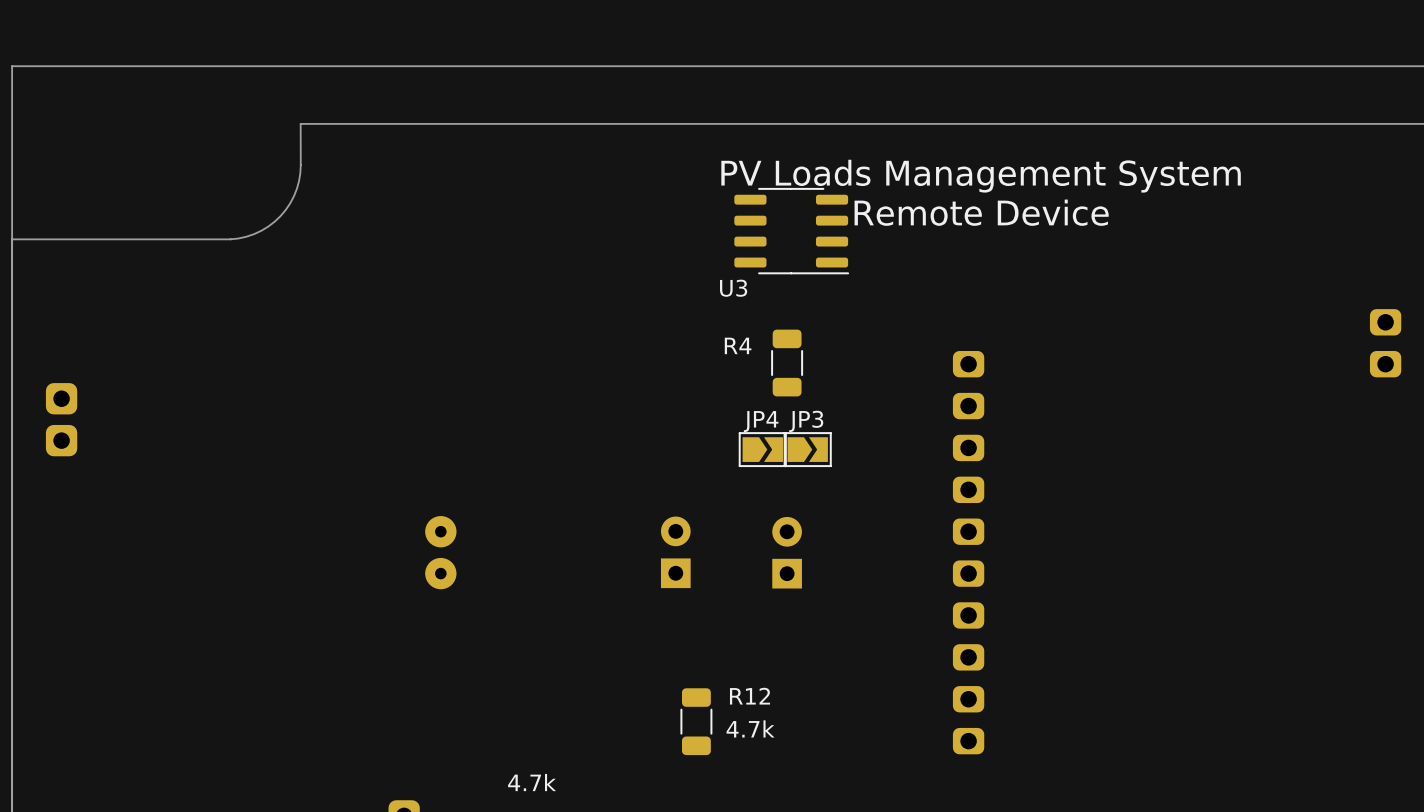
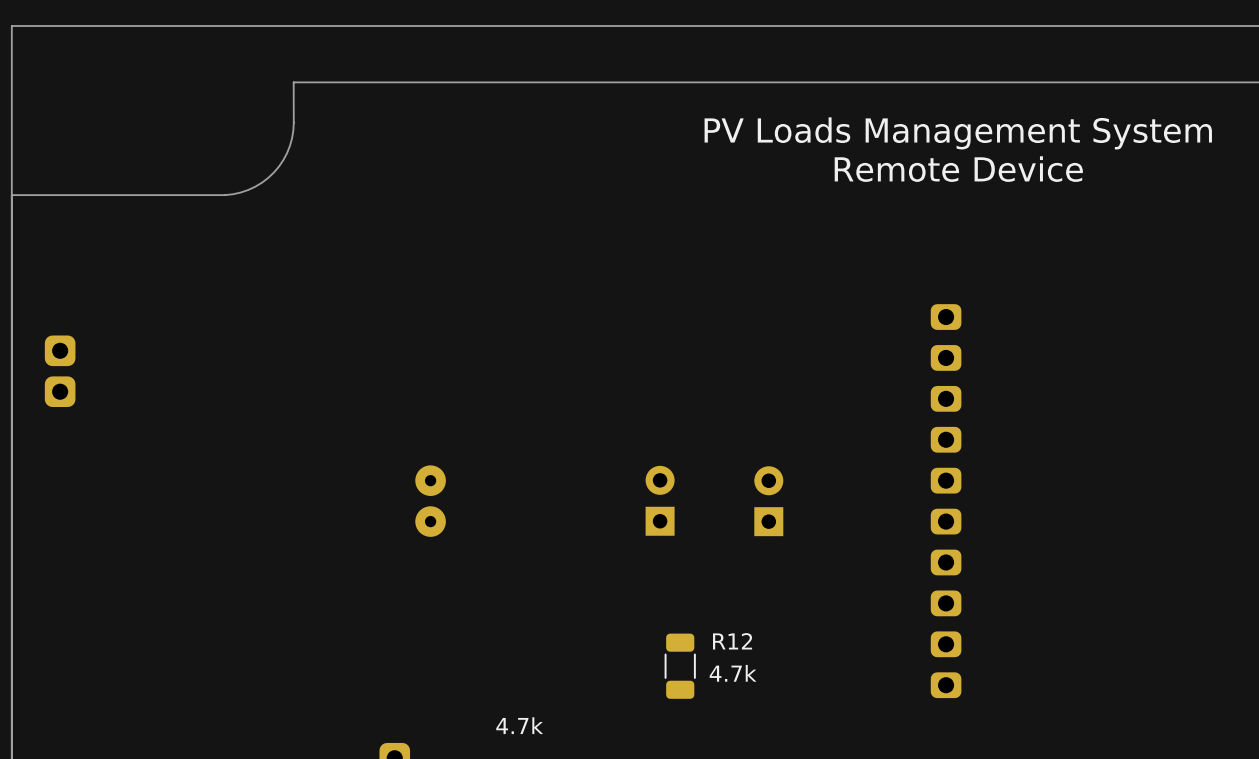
U3: (791, 231) -> none
R4: (787, 363) -> none
JP4: (762, 449) -> none
JP3: (807, 449) -> none

